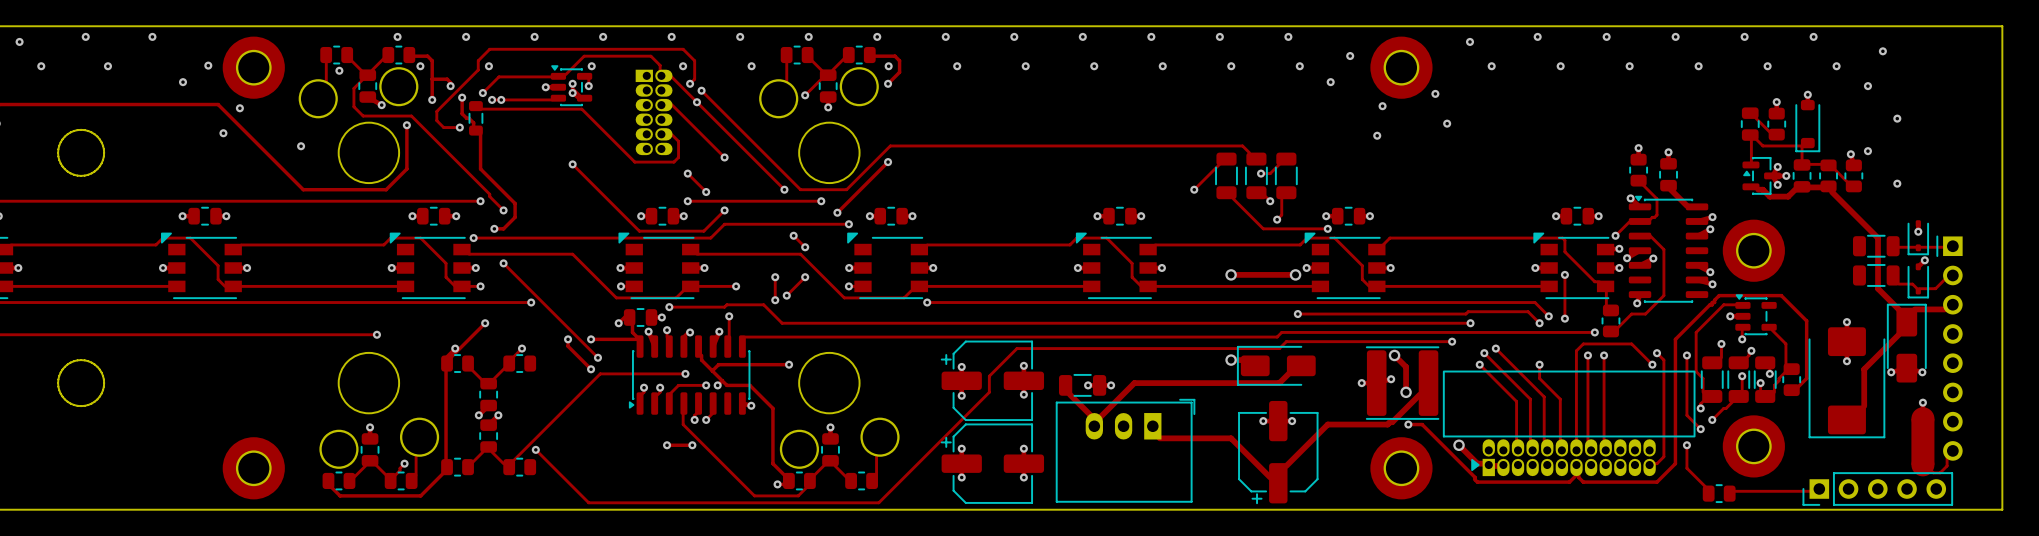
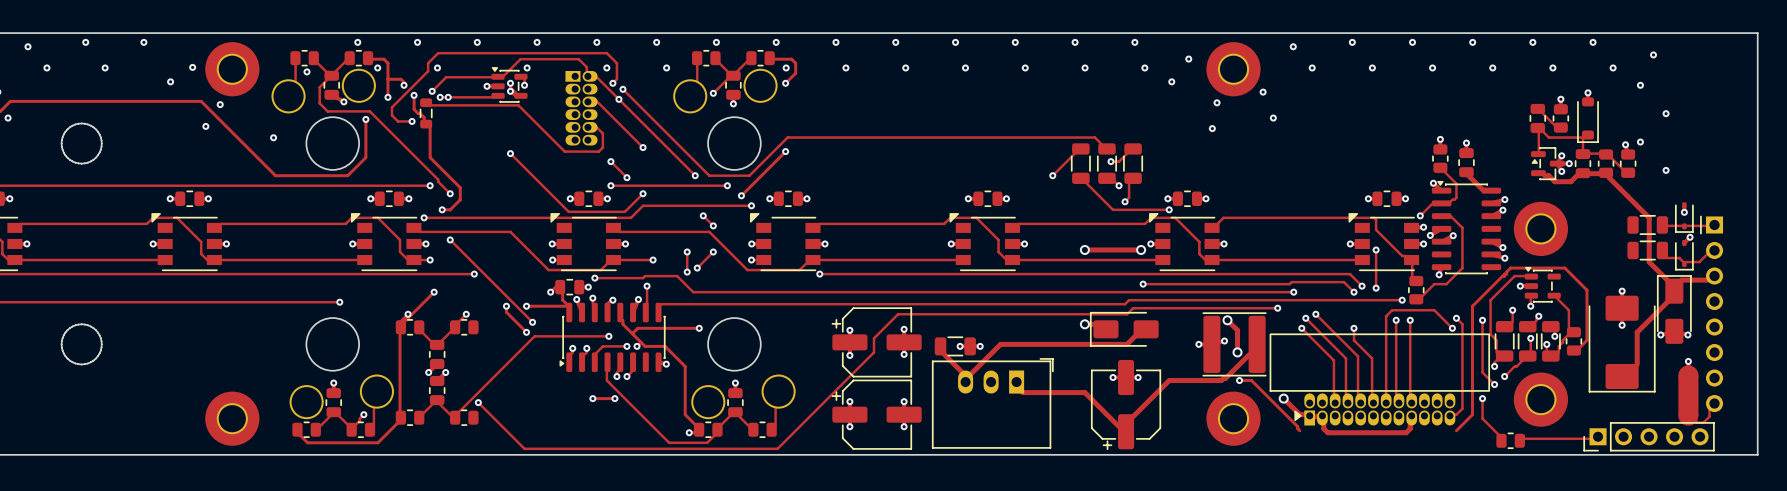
track: none -> (1323, 424) (1323, 428) (1327, 432) (1406, 432) (1410, 428) (1410, 424)
track: (1576, 475) (1569, 482) (1477, 482) -> none
track: (1578, 475) (1583, 482) (1657, 482) -> none

